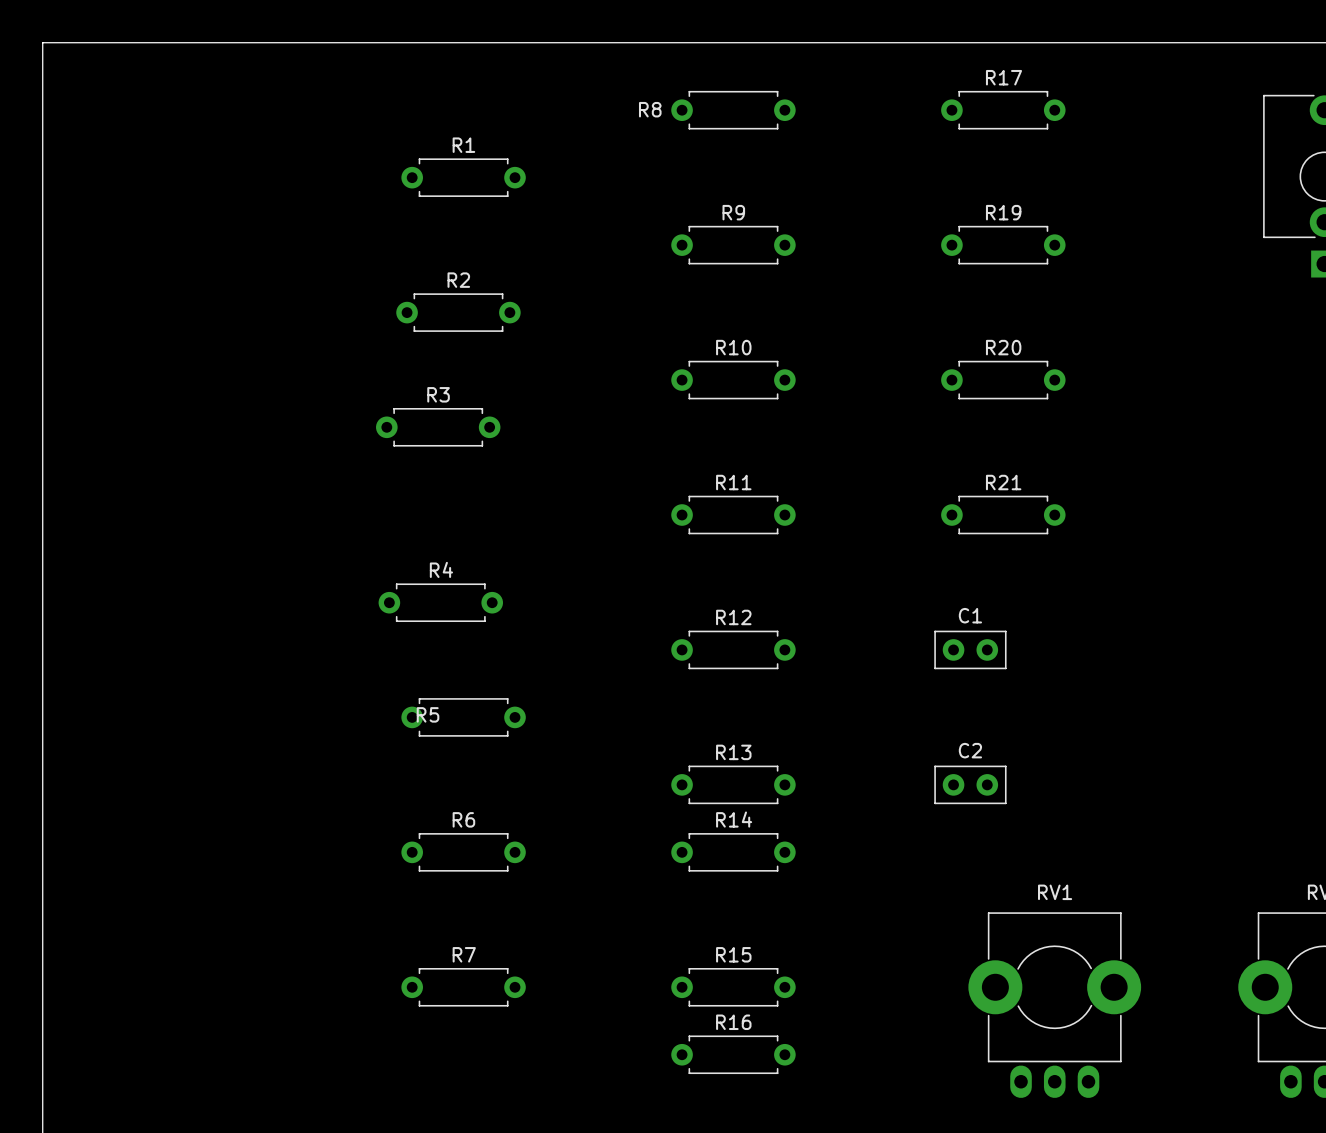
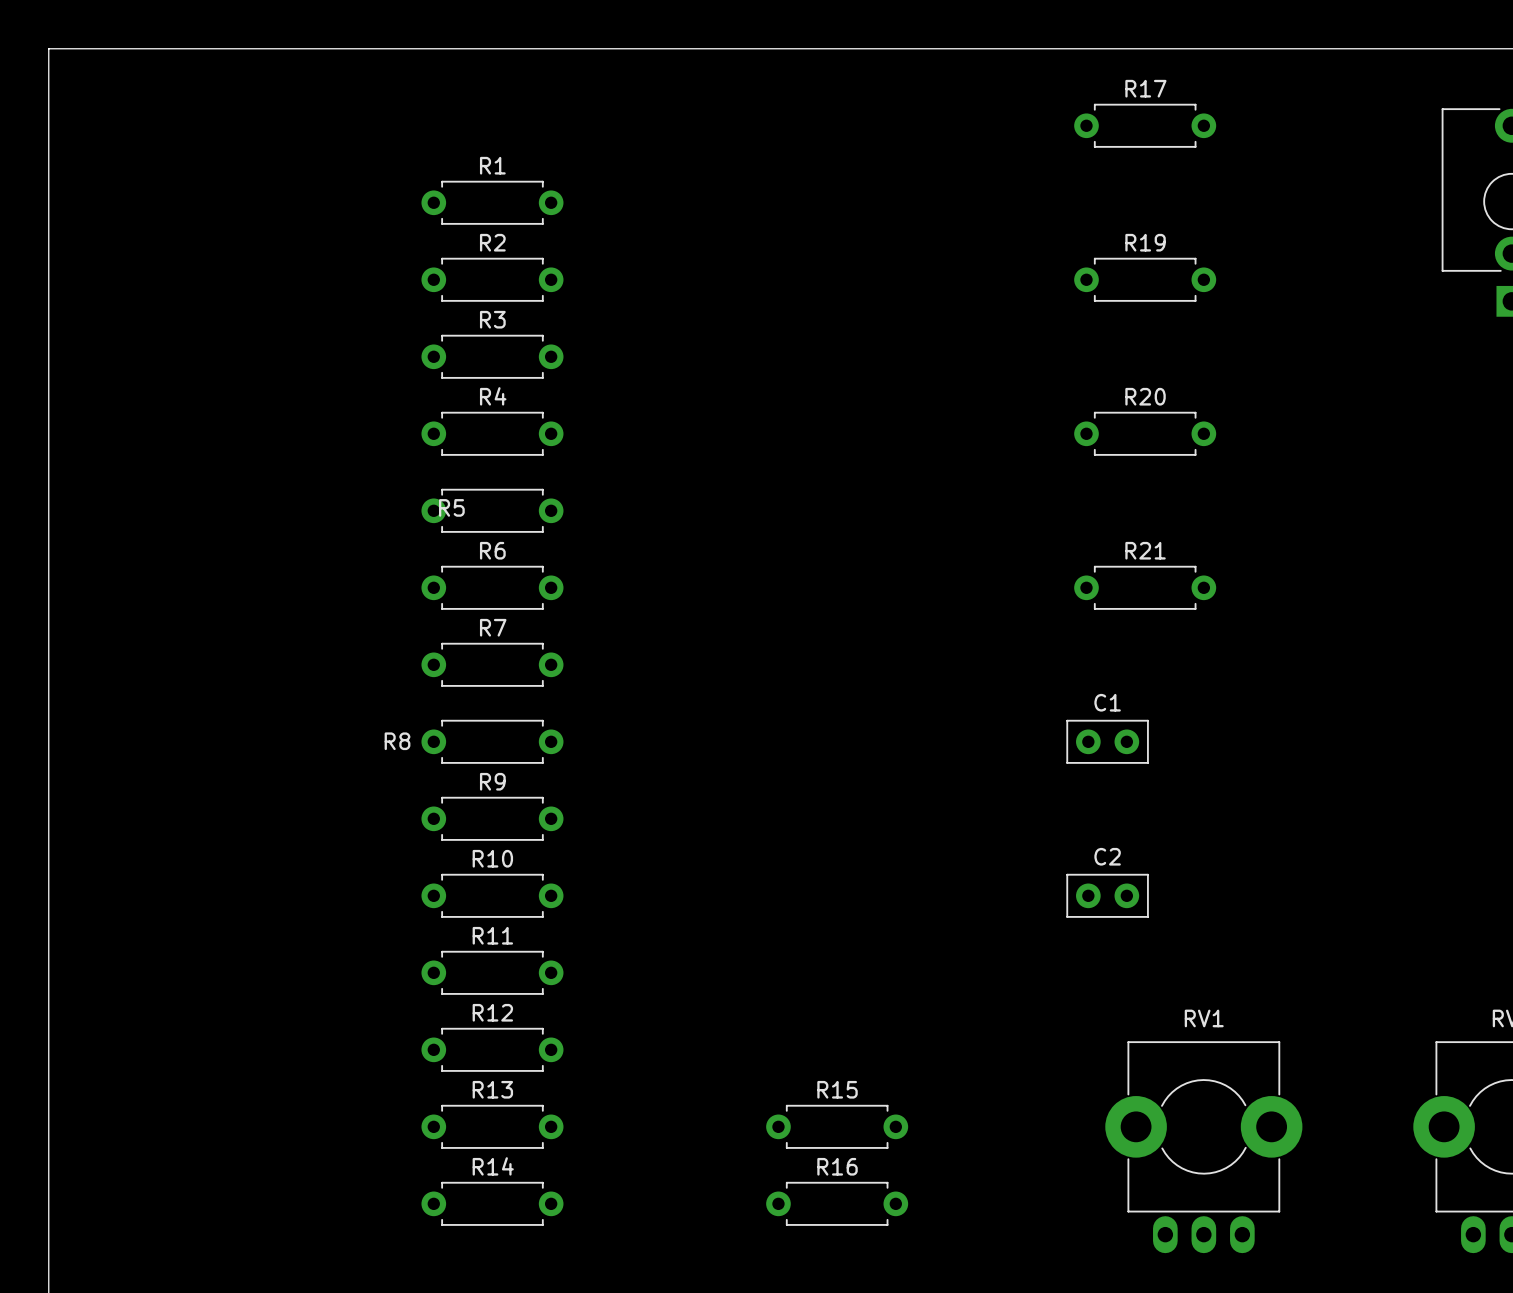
R8 position: (733, 110) -> (492, 741)
R1 position: (463, 177) -> (492, 202)
R9 position: (733, 245) -> (492, 818)
R2 position: (458, 312) -> (492, 279)
R10 position: (733, 380) -> (492, 895)
R3 position: (438, 427) -> (492, 356)
R11 position: (733, 515) -> (492, 972)
R4 position: (440, 602) -> (492, 433)
R12 position: (733, 649) -> (492, 1049)
R5 position: (463, 717) -> (492, 510)
R13 position: (733, 784) -> (492, 1126)
R6 position: (463, 852) -> (492, 587)
R14 position: (733, 852) -> (492, 1203)
R7 position: (463, 987) -> (492, 664)

